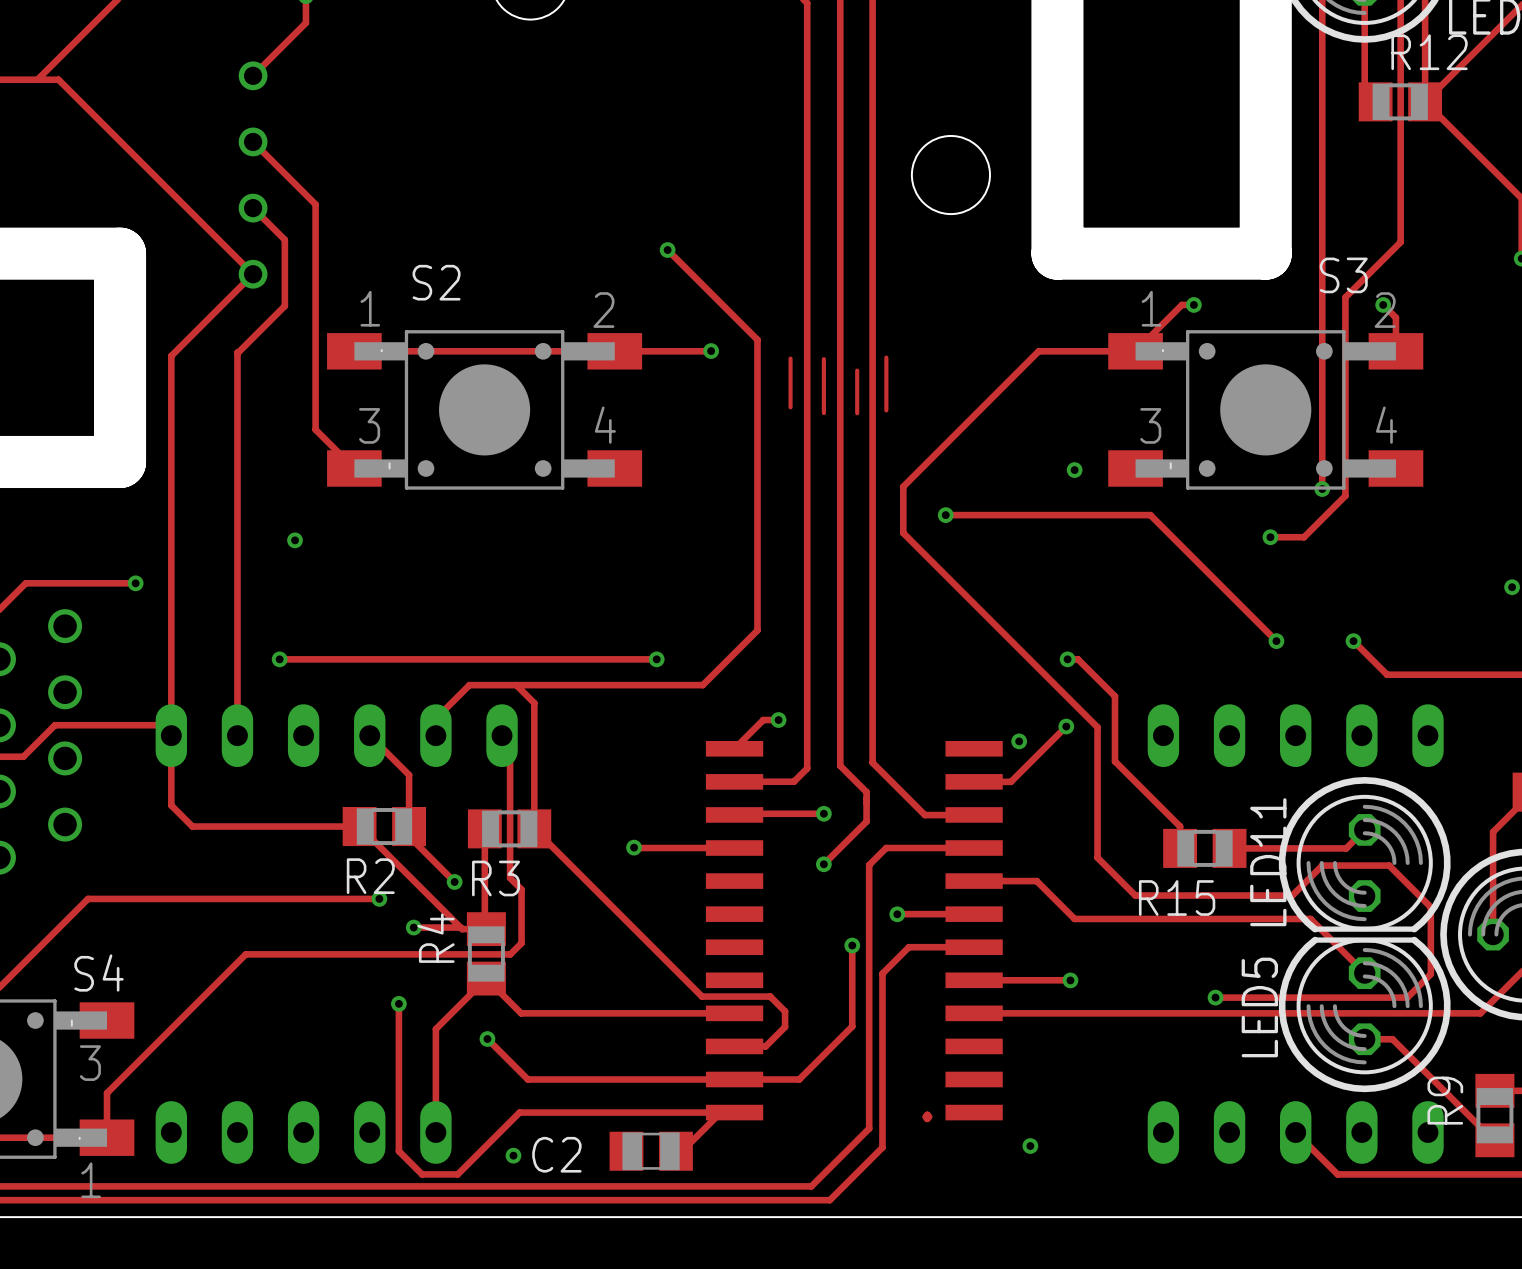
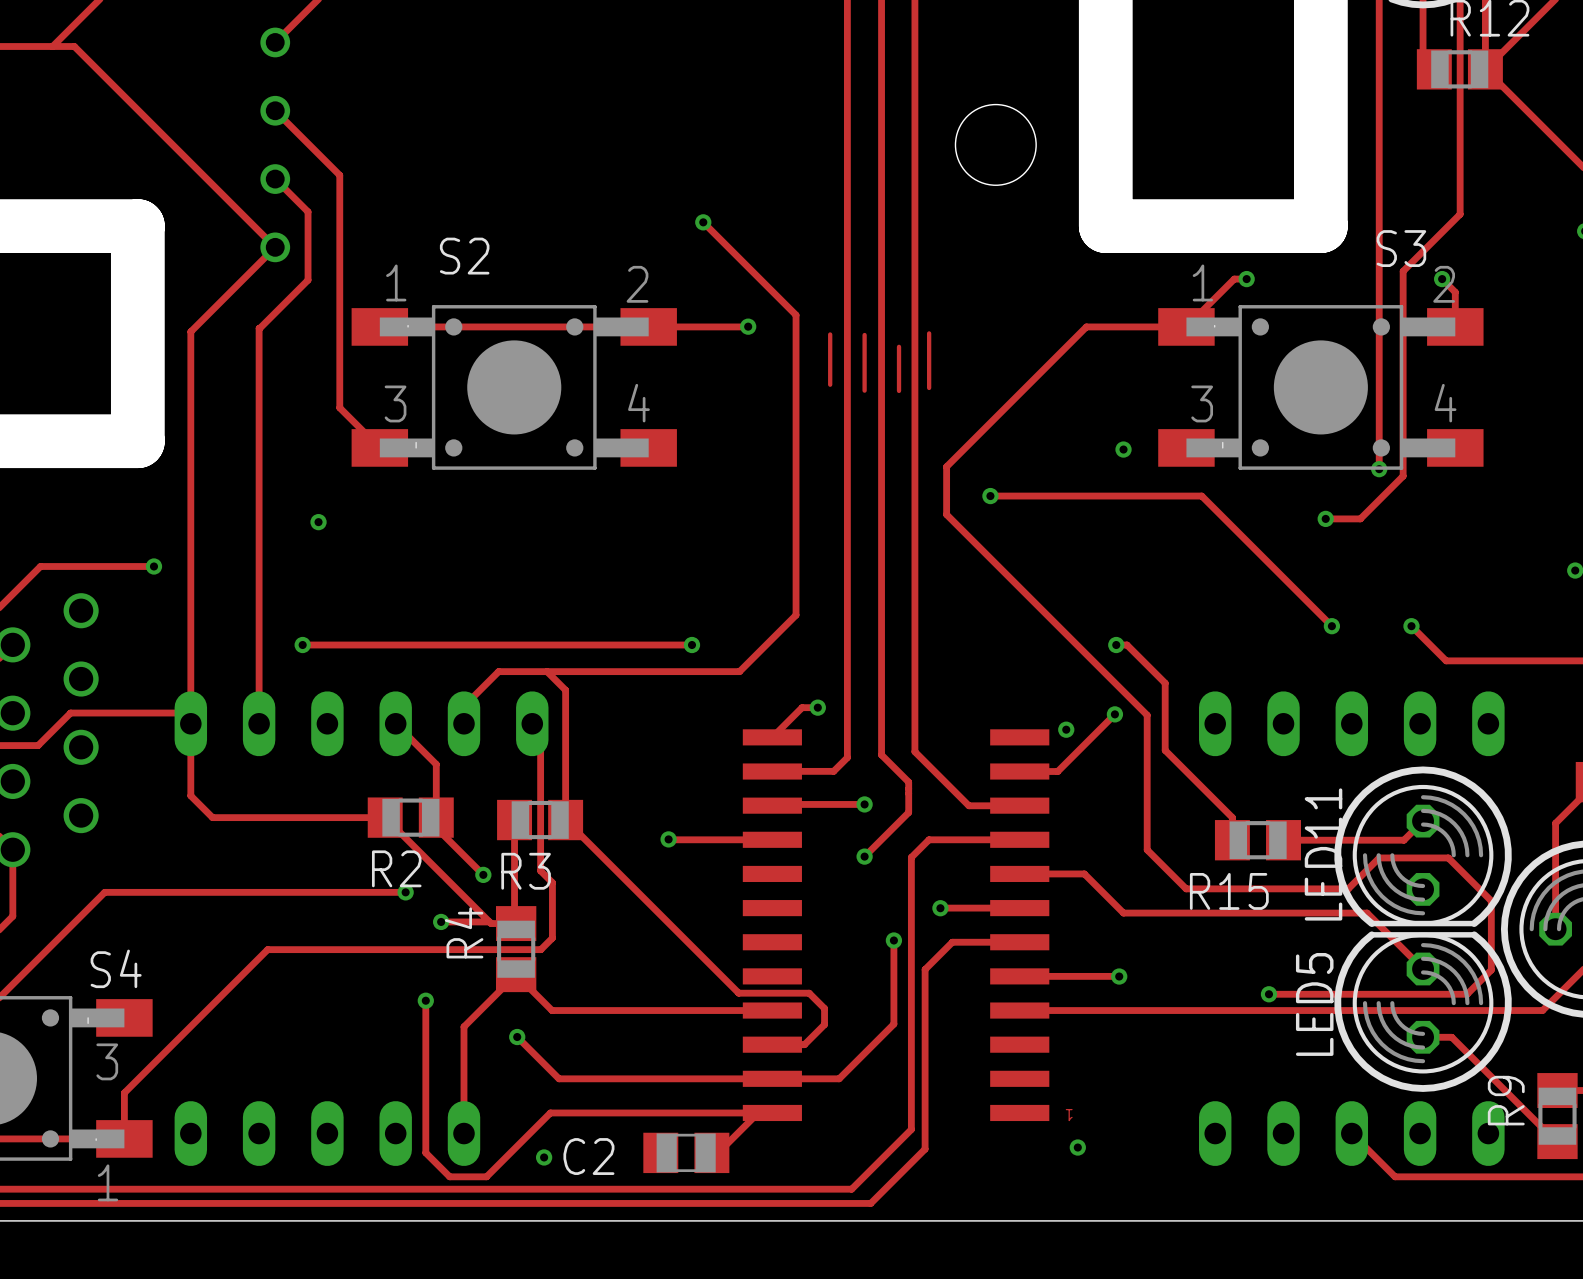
text: none -> 1 (1069, 1115)
text: . (927, 1116) -> none

